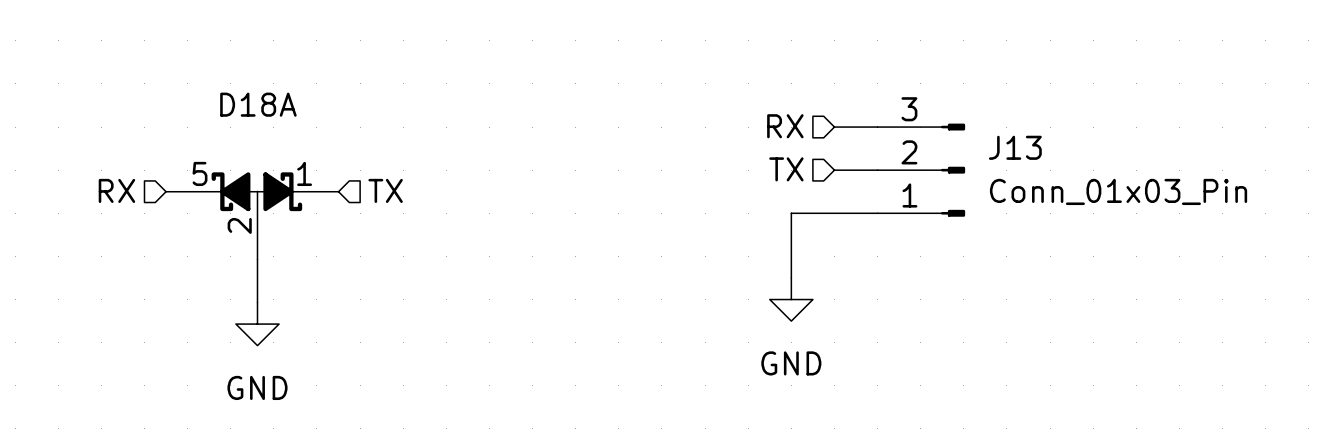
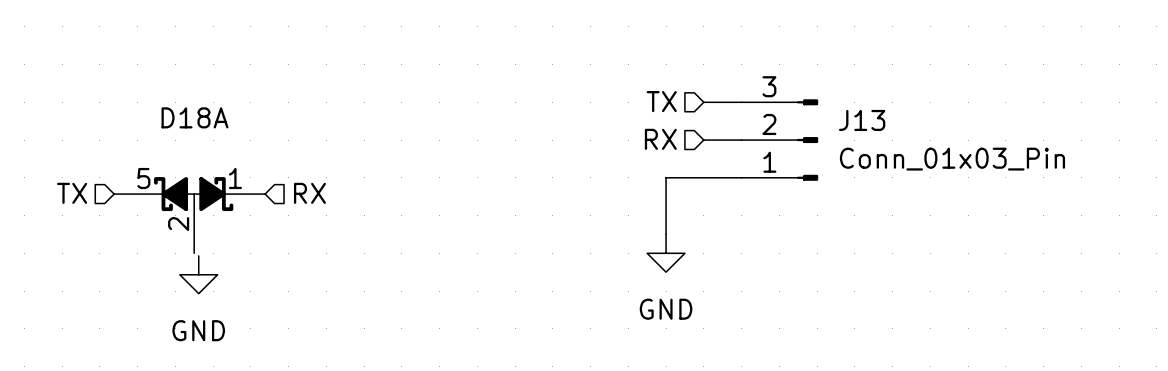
hierarchical label: RX (785, 126) -> TX (661, 101)
hierarchical label: TX (786, 169) -> RX (660, 139)
hierarchical label rotation: 0° (116, 190) -> 180° (309, 193)
hierarchical label position: RX (116, 190) -> RX (309, 193)
hierarchical label rotation: 0° (385, 190) -> 180° (72, 193)
hierarchical label position: TX (385, 190) -> TX (72, 193)
D18A position: (252, 215) -> (189, 215)
wire: (257, 259) (257, 302) -> none

